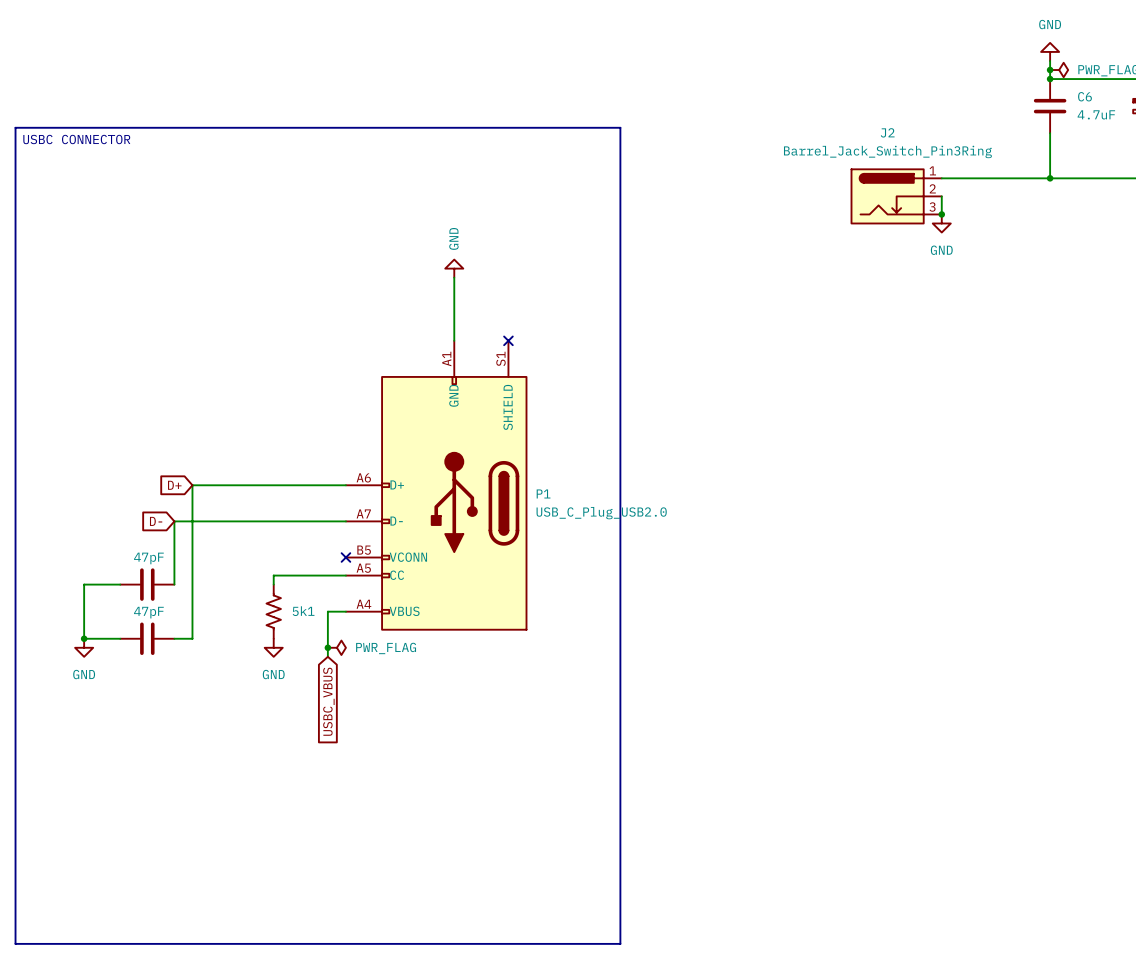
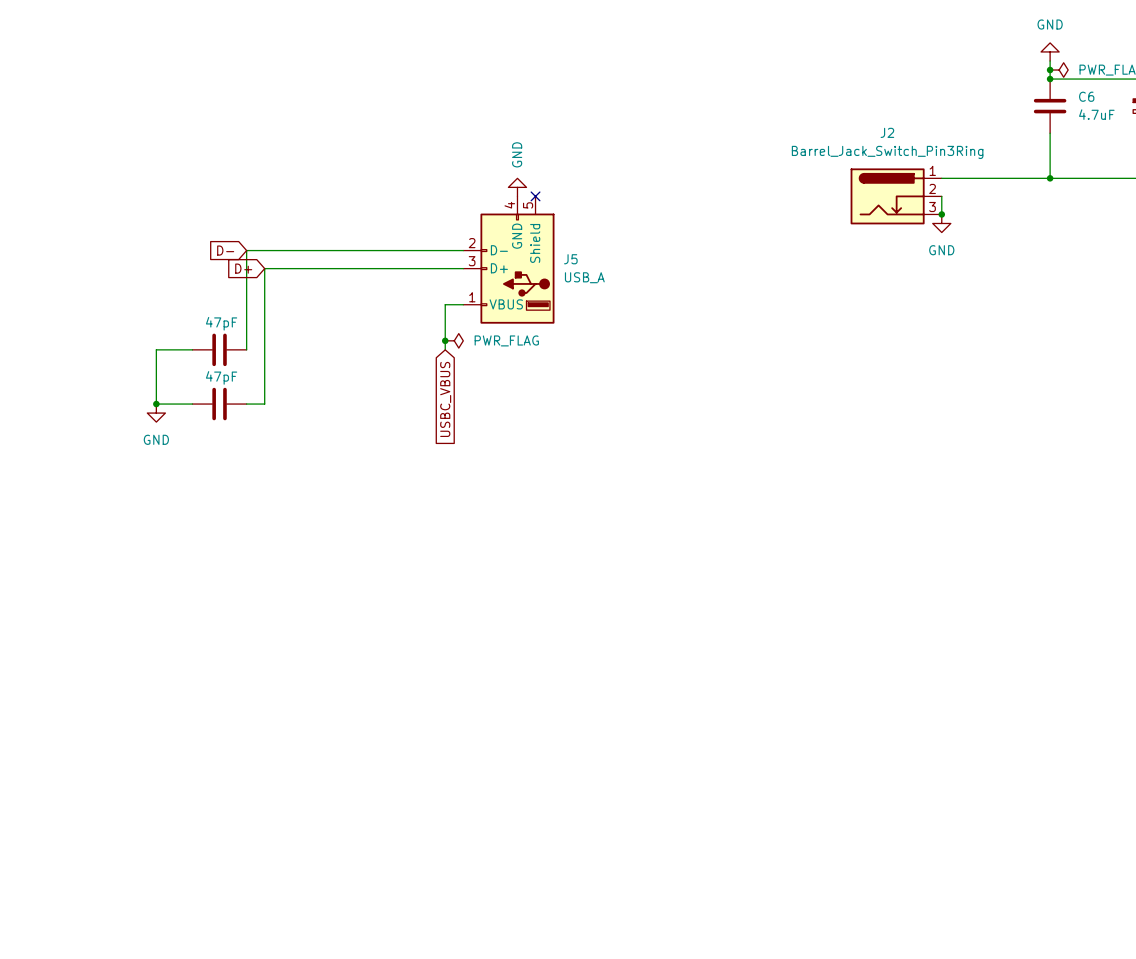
line: (15, 127) (620, 127) (620, 943) (15, 943) (15, 127) -> none
text: USBC CONNECTOR (76, 139) -> none
no-connect mark: none -> (535, 196)
global label: none -> D- (225, 250)
wire: none -> (463, 250) (246, 250) (246, 349)
J5: none -> USB_A (508, 260)
global label: none -> D+ (243, 268)
power symbol position: GND (454, 268) -> GND (517, 187)
wire: none -> (463, 268) (264, 268) (264, 404) (246, 404)
wire: (454, 277) (454, 340) -> none
wire: none -> (463, 304) (445, 304) (445, 349)
junction: none -> (445, 340)
power symbol: none -> PWR_FLAG (454, 340)
no-connect mark: (508, 340) -> none
wire: none -> (192, 349) (156, 349) (156, 404) (192, 404)
part: none -> 47pF (219, 349)
global label: none -> USBC_VBUS (445, 399)
junction: none -> (156, 404)
part: none -> 47pF (219, 404)
power symbol: none -> GND (156, 413)
global label: D+ (174, 485) -> none
wire: (345, 485) (192, 485) (192, 638) (174, 638) -> none
P1: USB_C_Plug_USB2.0 (436, 485) -> none
global label: D- (156, 521) -> none
wire: (345, 521) (174, 521) (174, 584) -> none
no-connect mark: (345, 557) -> none
wire: (345, 575) (273, 575) (273, 584) -> none
wire: (120, 584) (84, 584) (84, 638) (120, 638) -> none
part: 47pF (147, 584) -> none
part: 5k1 (273, 611) -> none
wire: (345, 611) (327, 611) (327, 656) -> none
junction: (84, 638) -> none
part: 47pF (147, 638) -> none
power symbol: GND (84, 647) -> none
power symbol: GND (273, 647) -> none
junction: (327, 647) -> none
power symbol: PWR_FLAG (336, 647) -> none
global label: USBC_VBUS (328, 701) -> none

